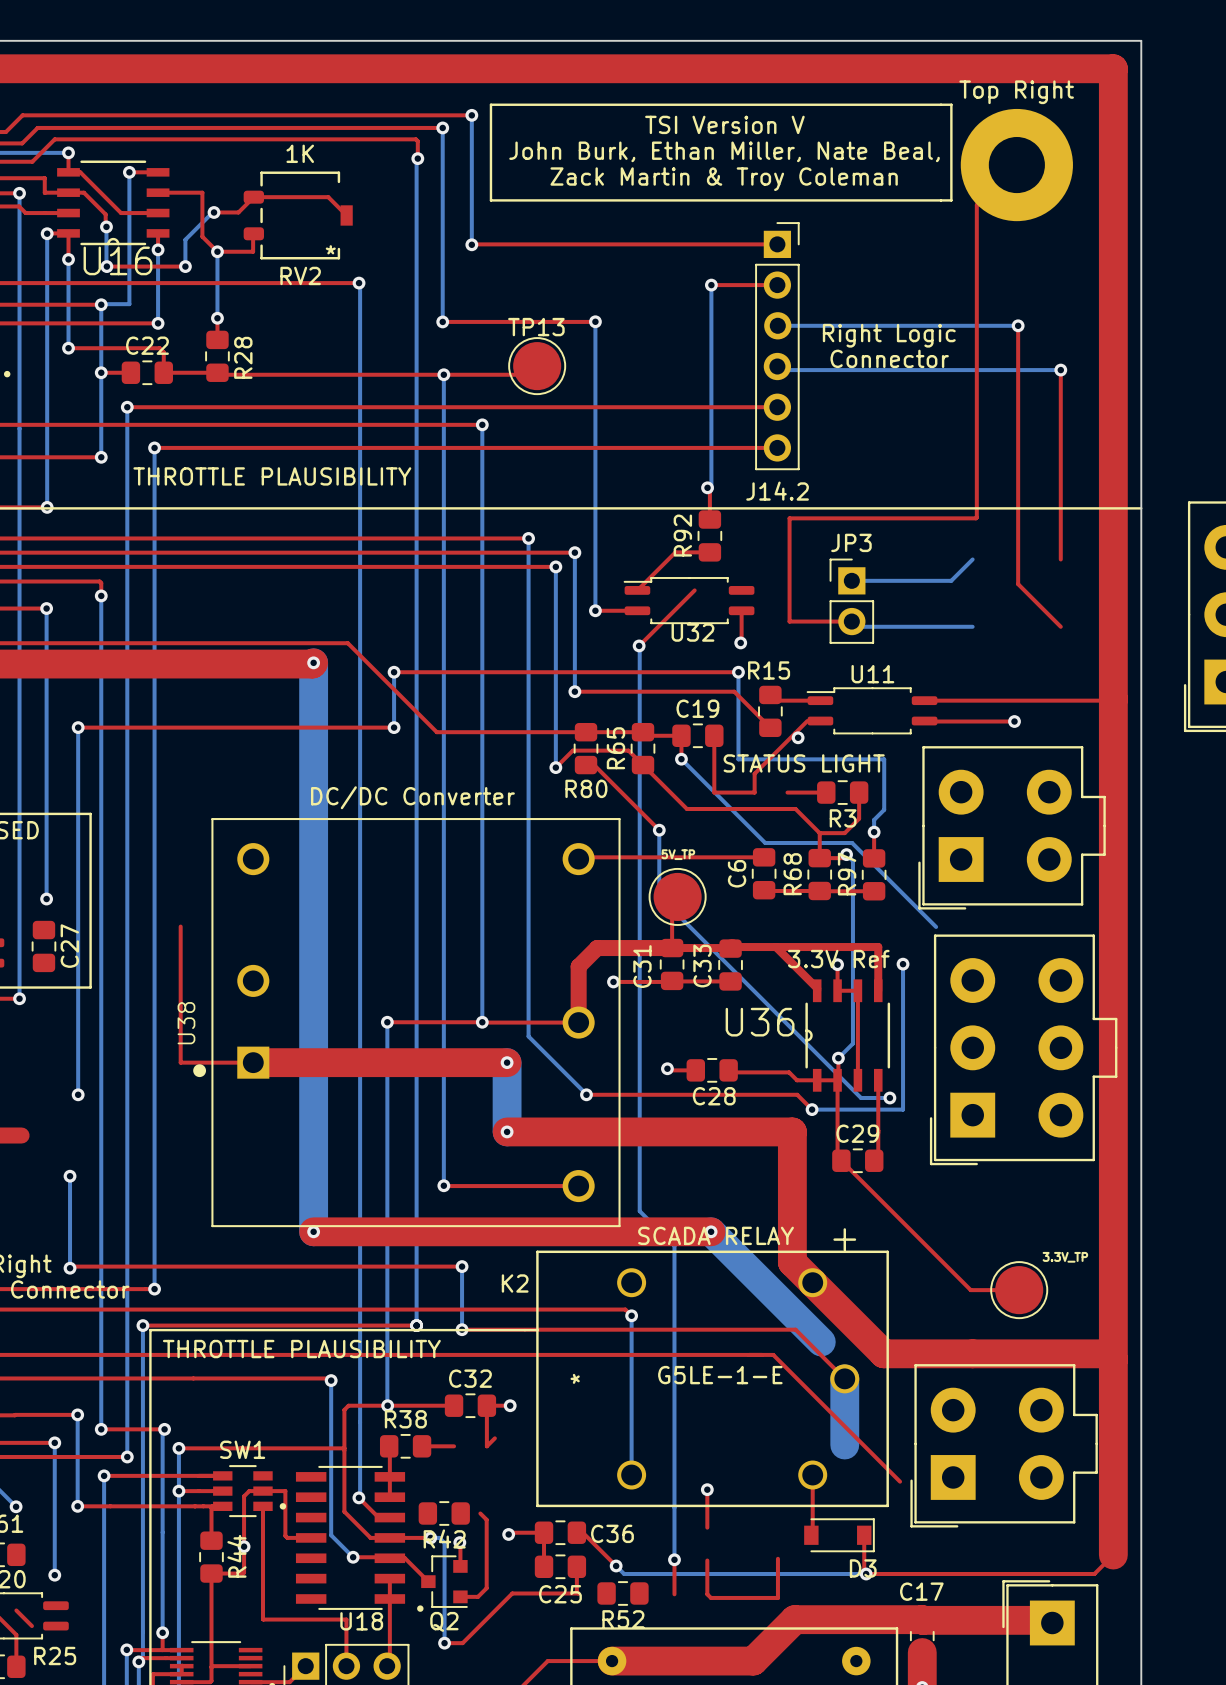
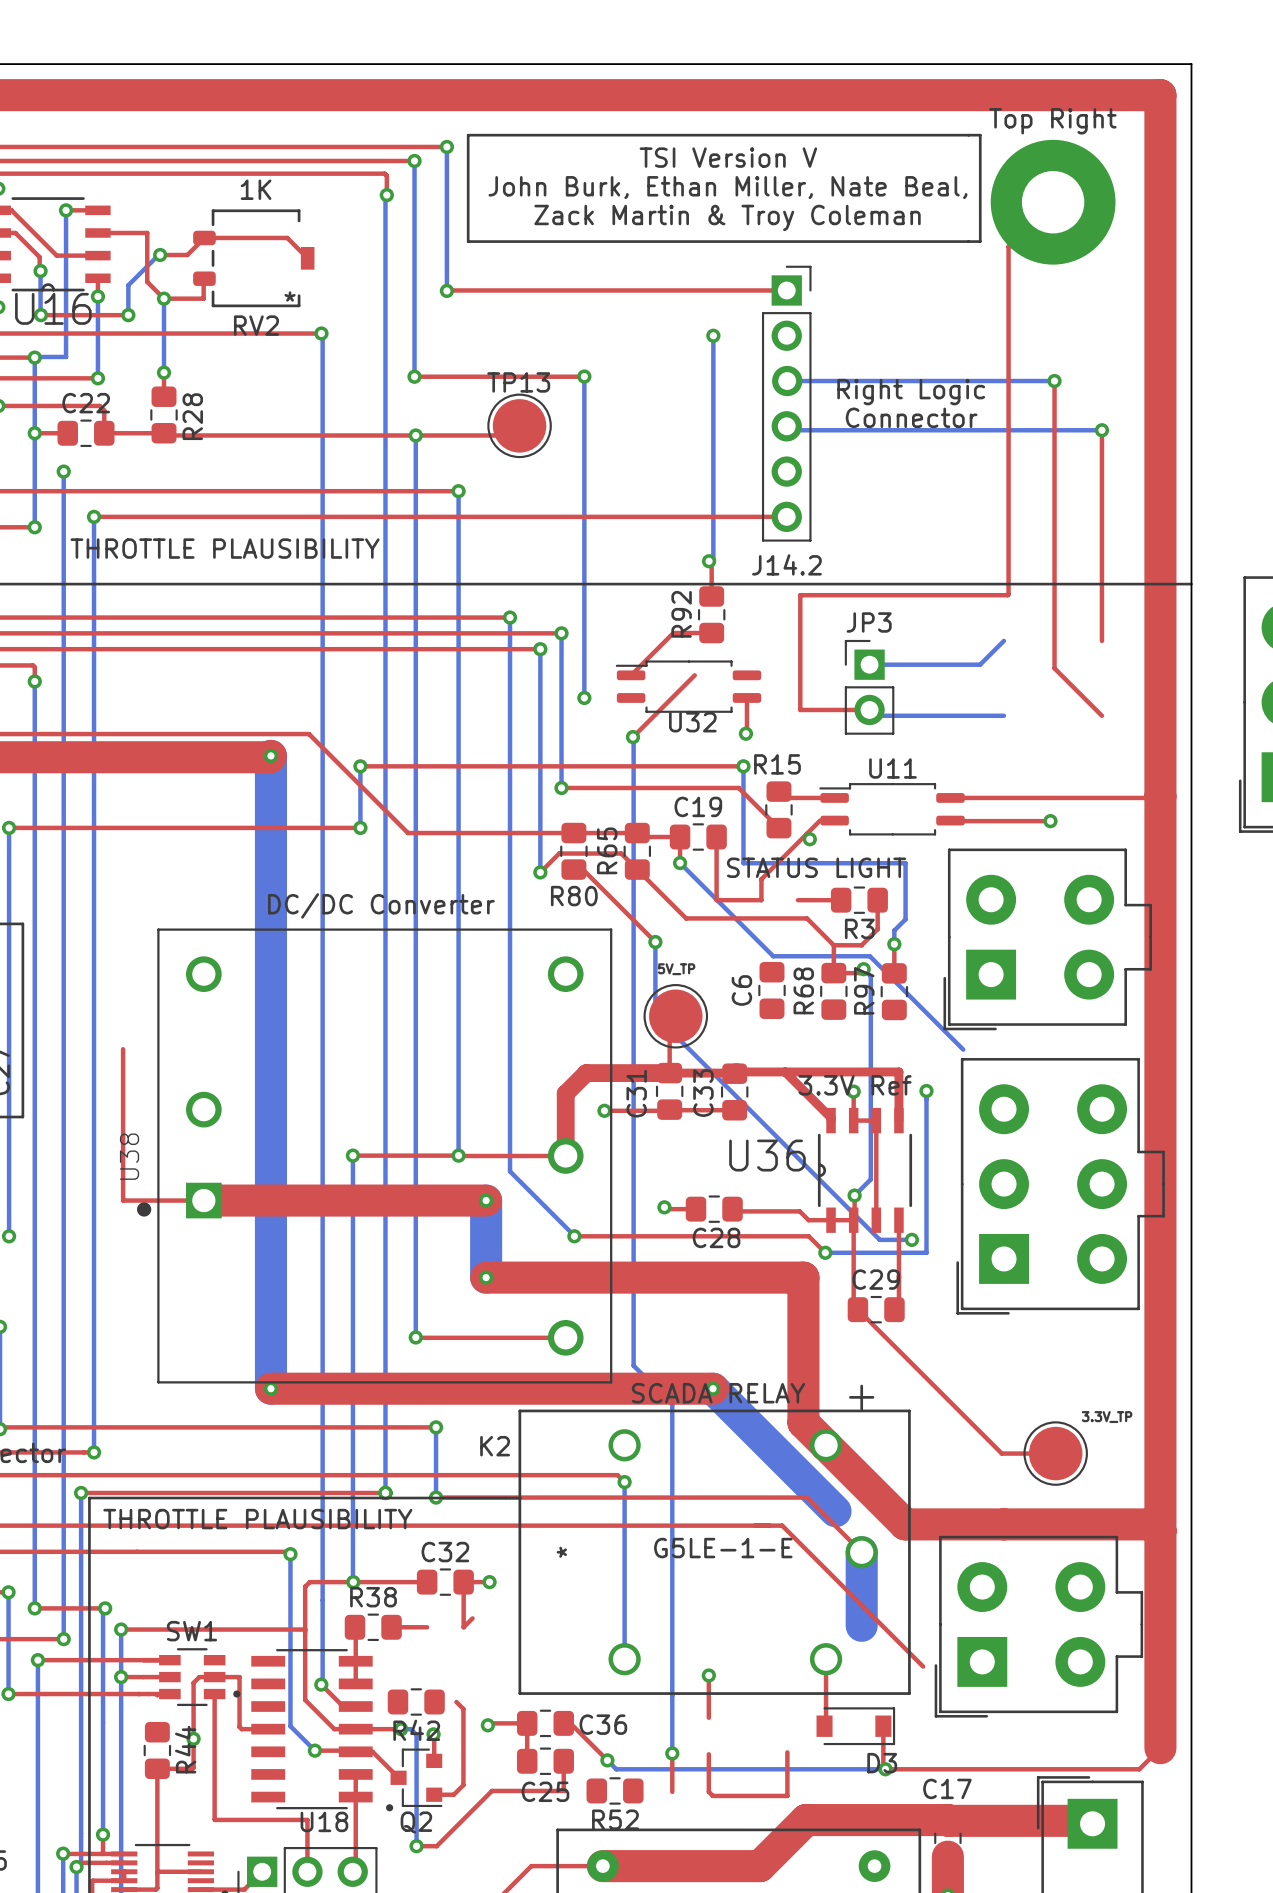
top track: (711, 285) (777, 285) -> none
top track: (127, 407) (777, 407) -> none
top track: (595, 610) (637, 610) -> none
top track: (580, 857) (764, 857) -> none
top track: (764, 890) (874, 891) -> none
top track: (211, 1507) (211, 1540) -> none

